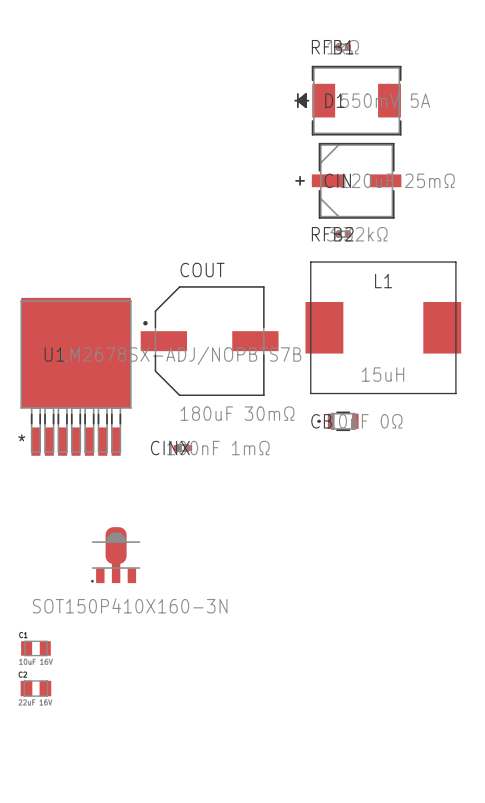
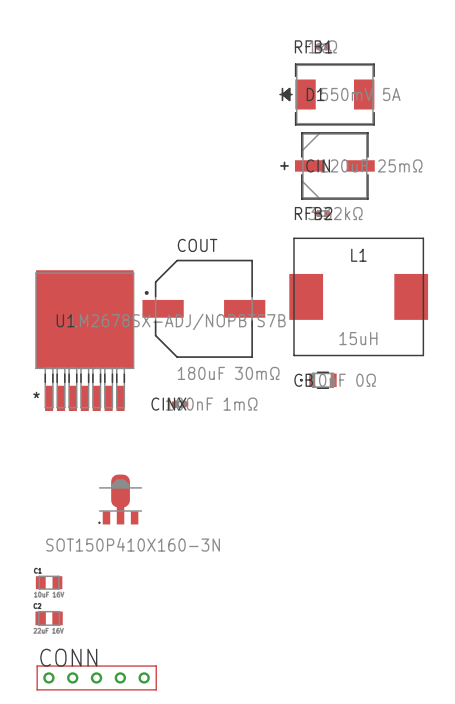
CONN: none -> (96, 677)

